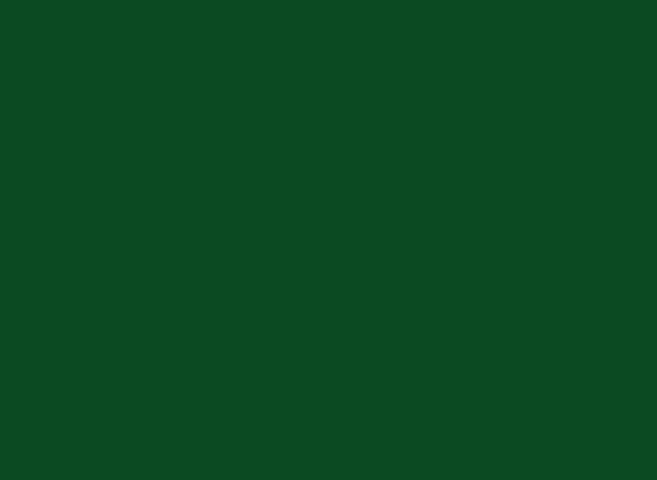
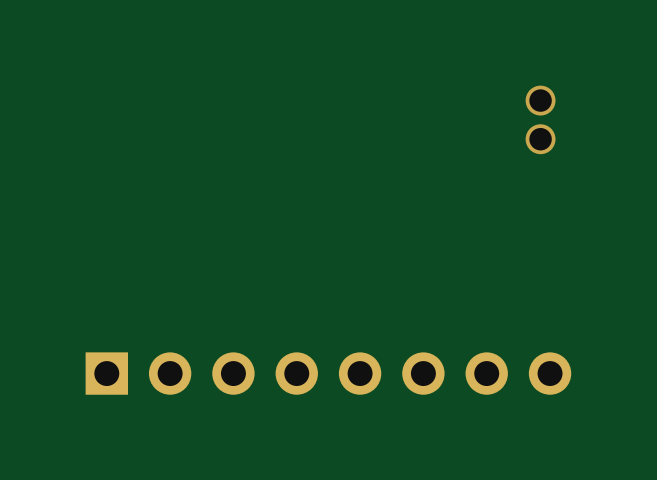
via: none -> (540, 100)
via: none -> (540, 139)
part: none -> (328, 373)

